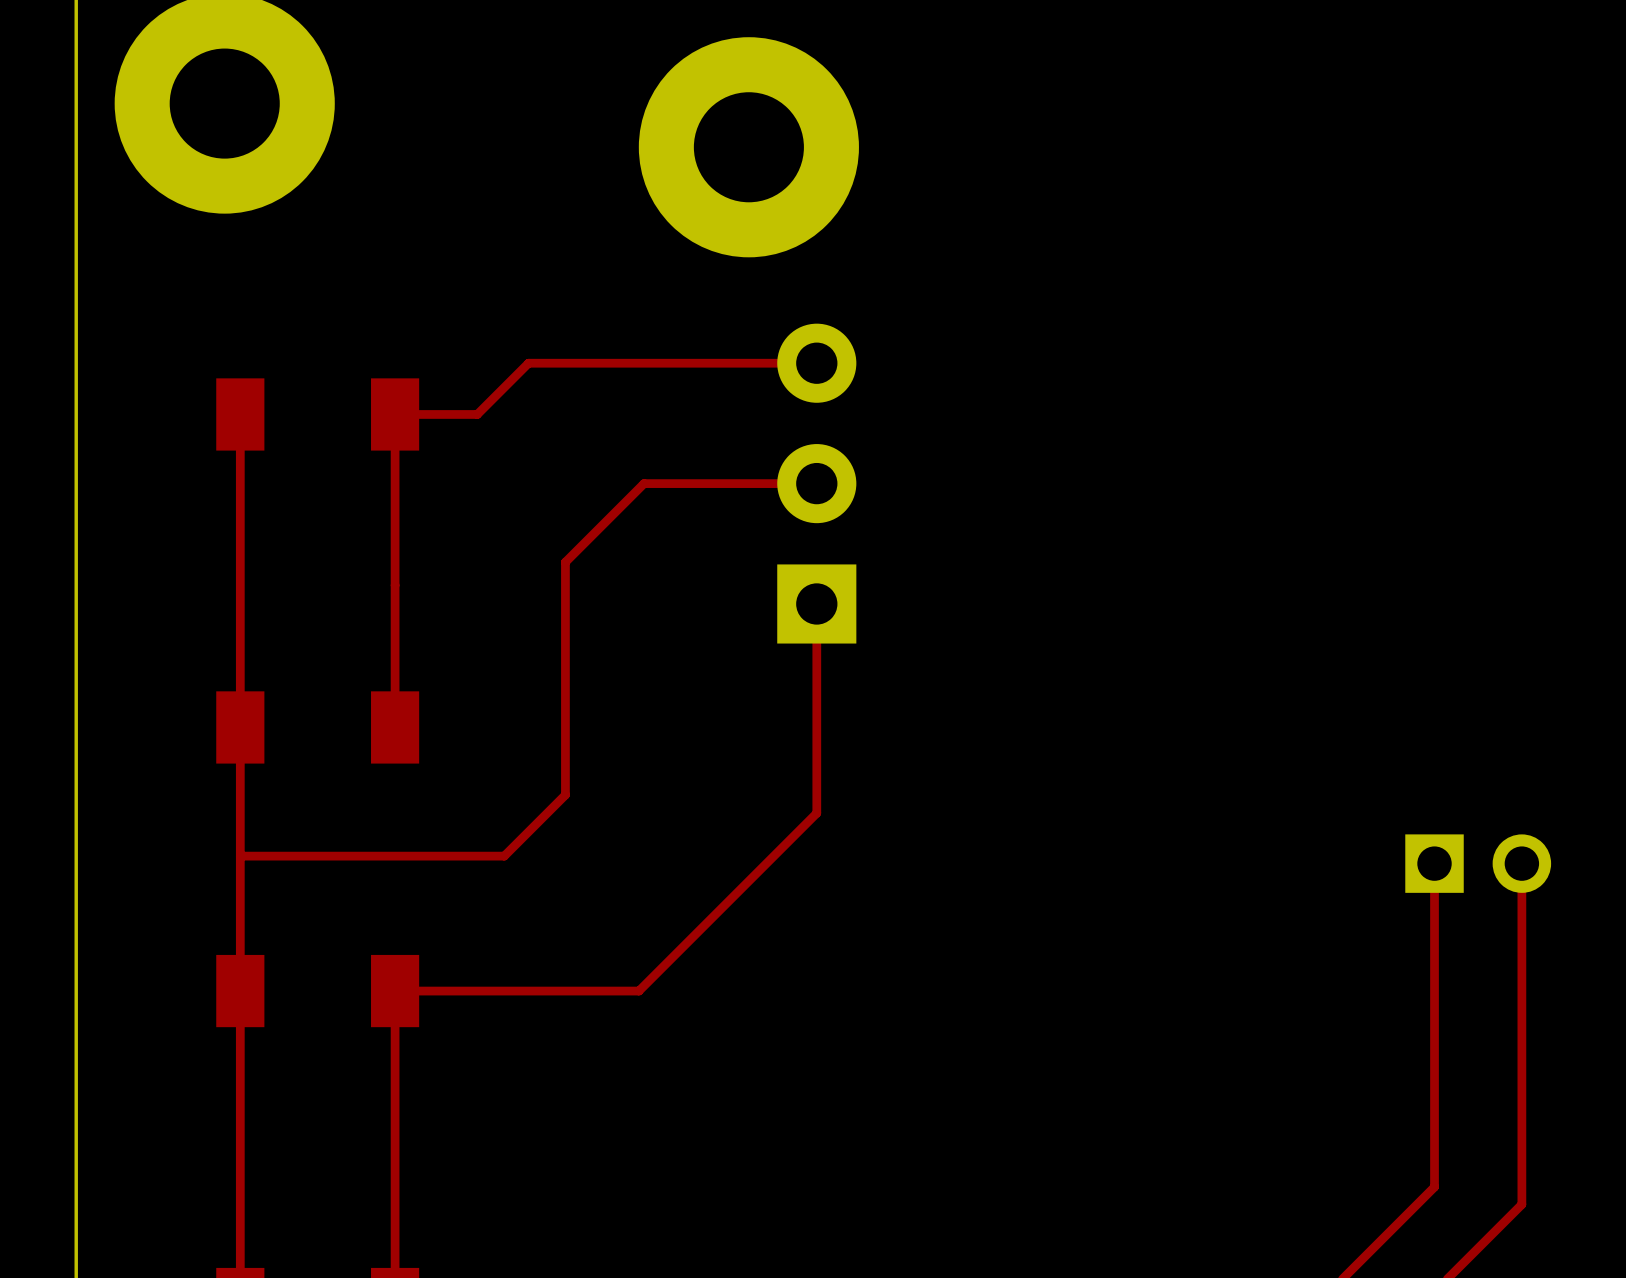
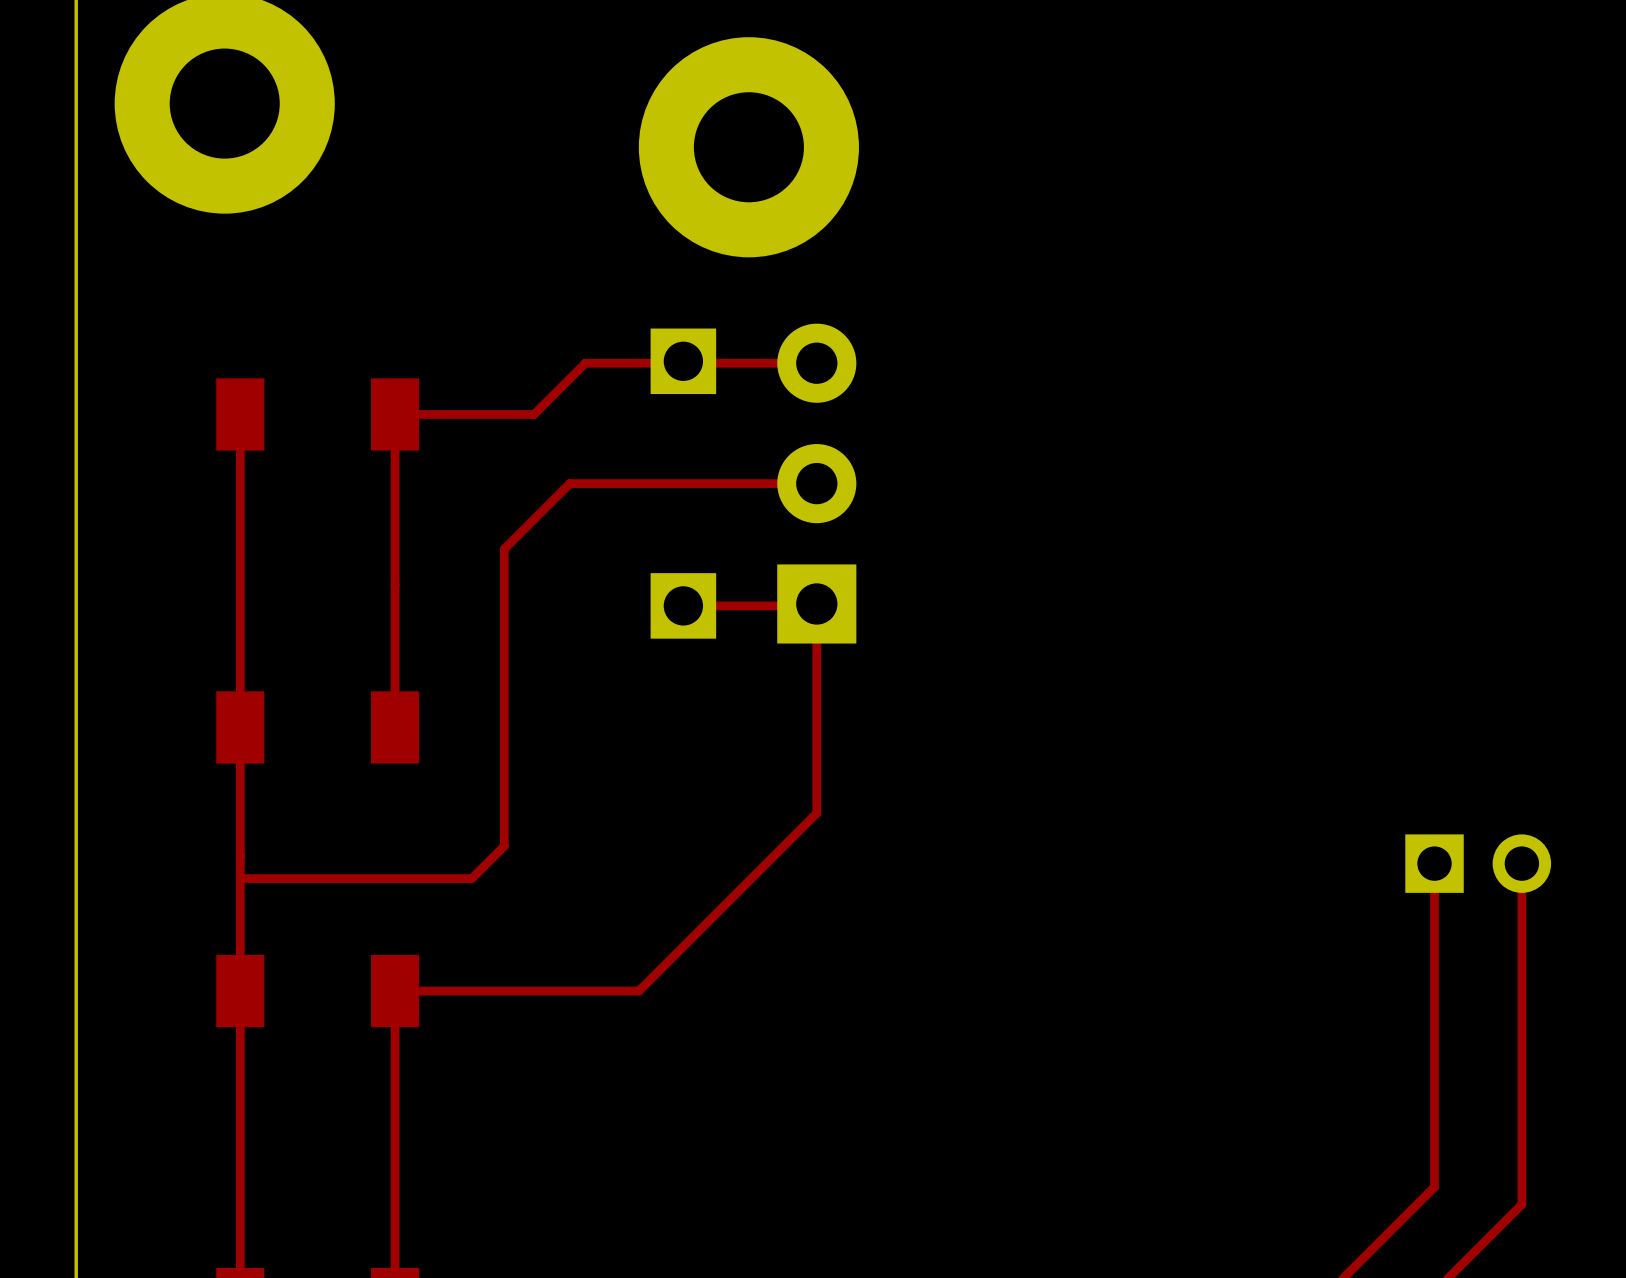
part: none -> (683, 361)
top track: (585, 363) (528, 363) (477, 414) -> (585, 363) (534, 414) (477, 414)
top track: (644, 483) (565, 562) (565, 794) (504, 856) (240, 856) -> (644, 483) (569, 483) (504, 549) (504, 846) (471, 878) (240, 878)
top track: none -> (816, 603) (814, 605) (683, 605)
part: none -> (683, 605)

